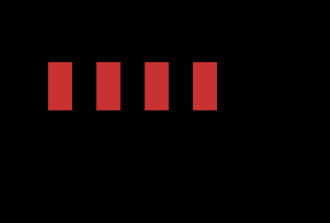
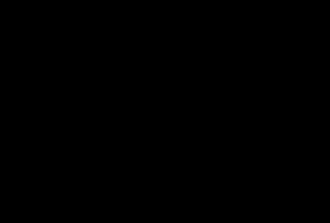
part: (132, 86) -> none

